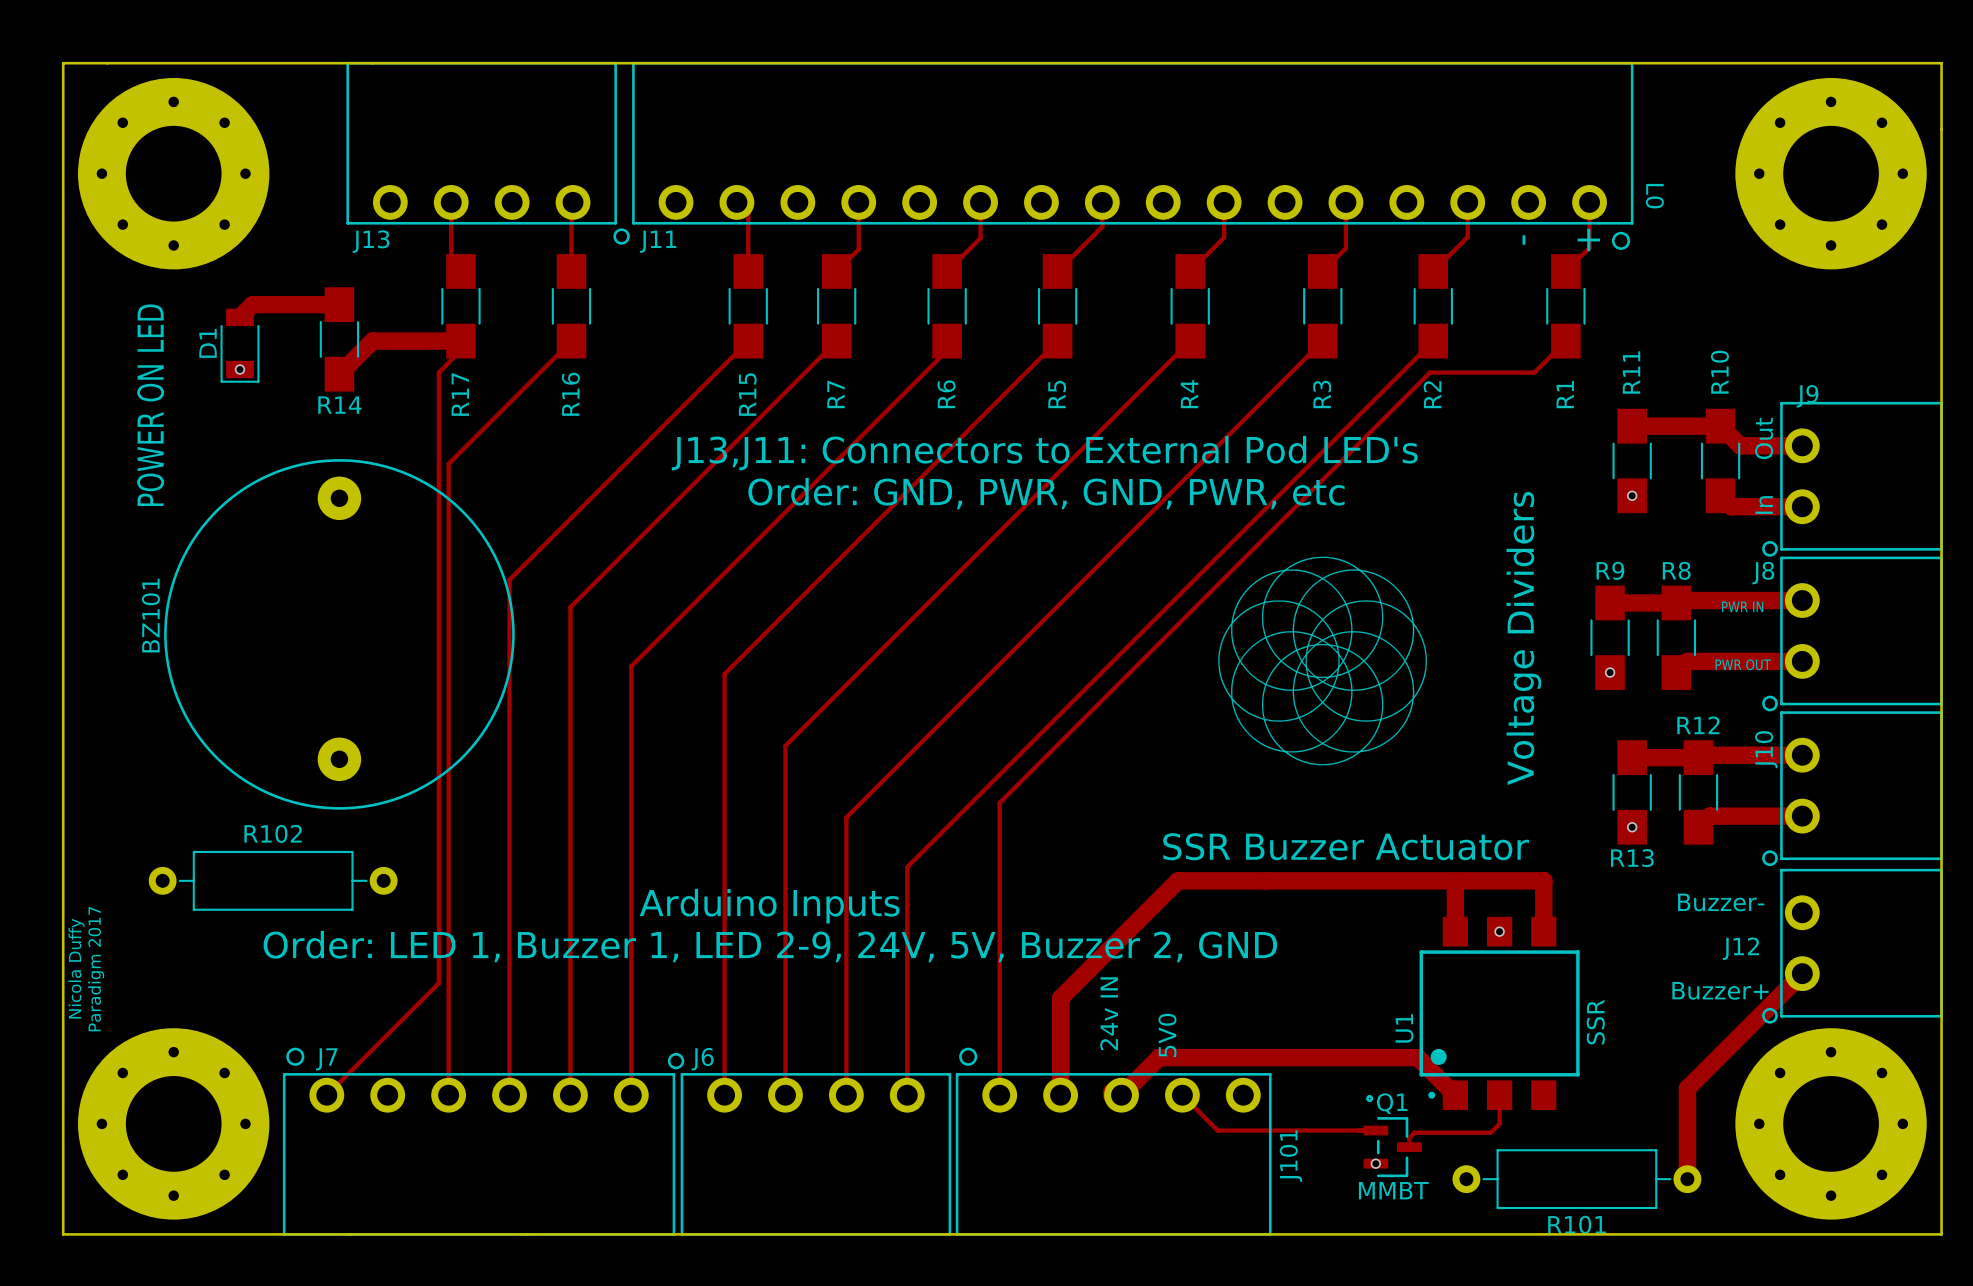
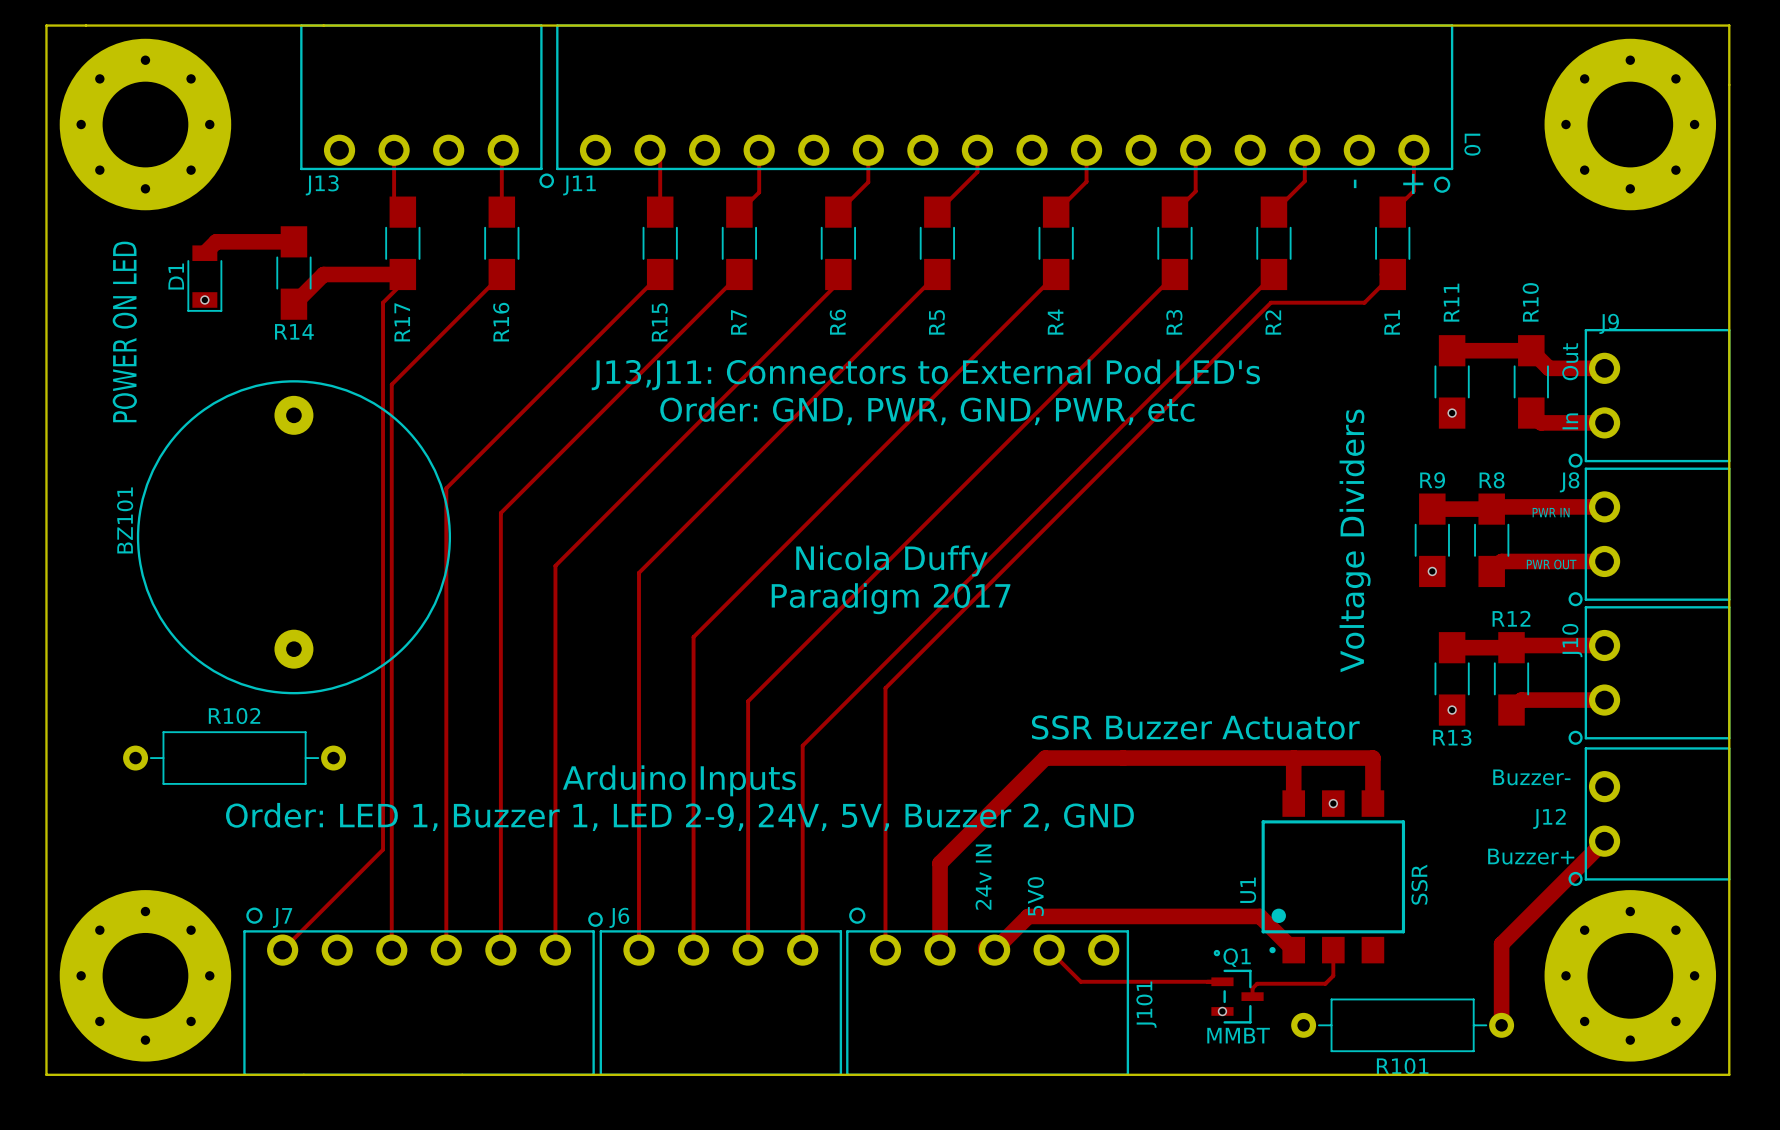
drawing: [1218, 556, 1427, 766] -> none
text: none -> Nicola Duffy (891, 561)
text: none -> Paradigm 2017 (891, 598)
text: Nicola Duffy (76, 968) -> none
text: Paradigm 2017 (96, 969) -> none

